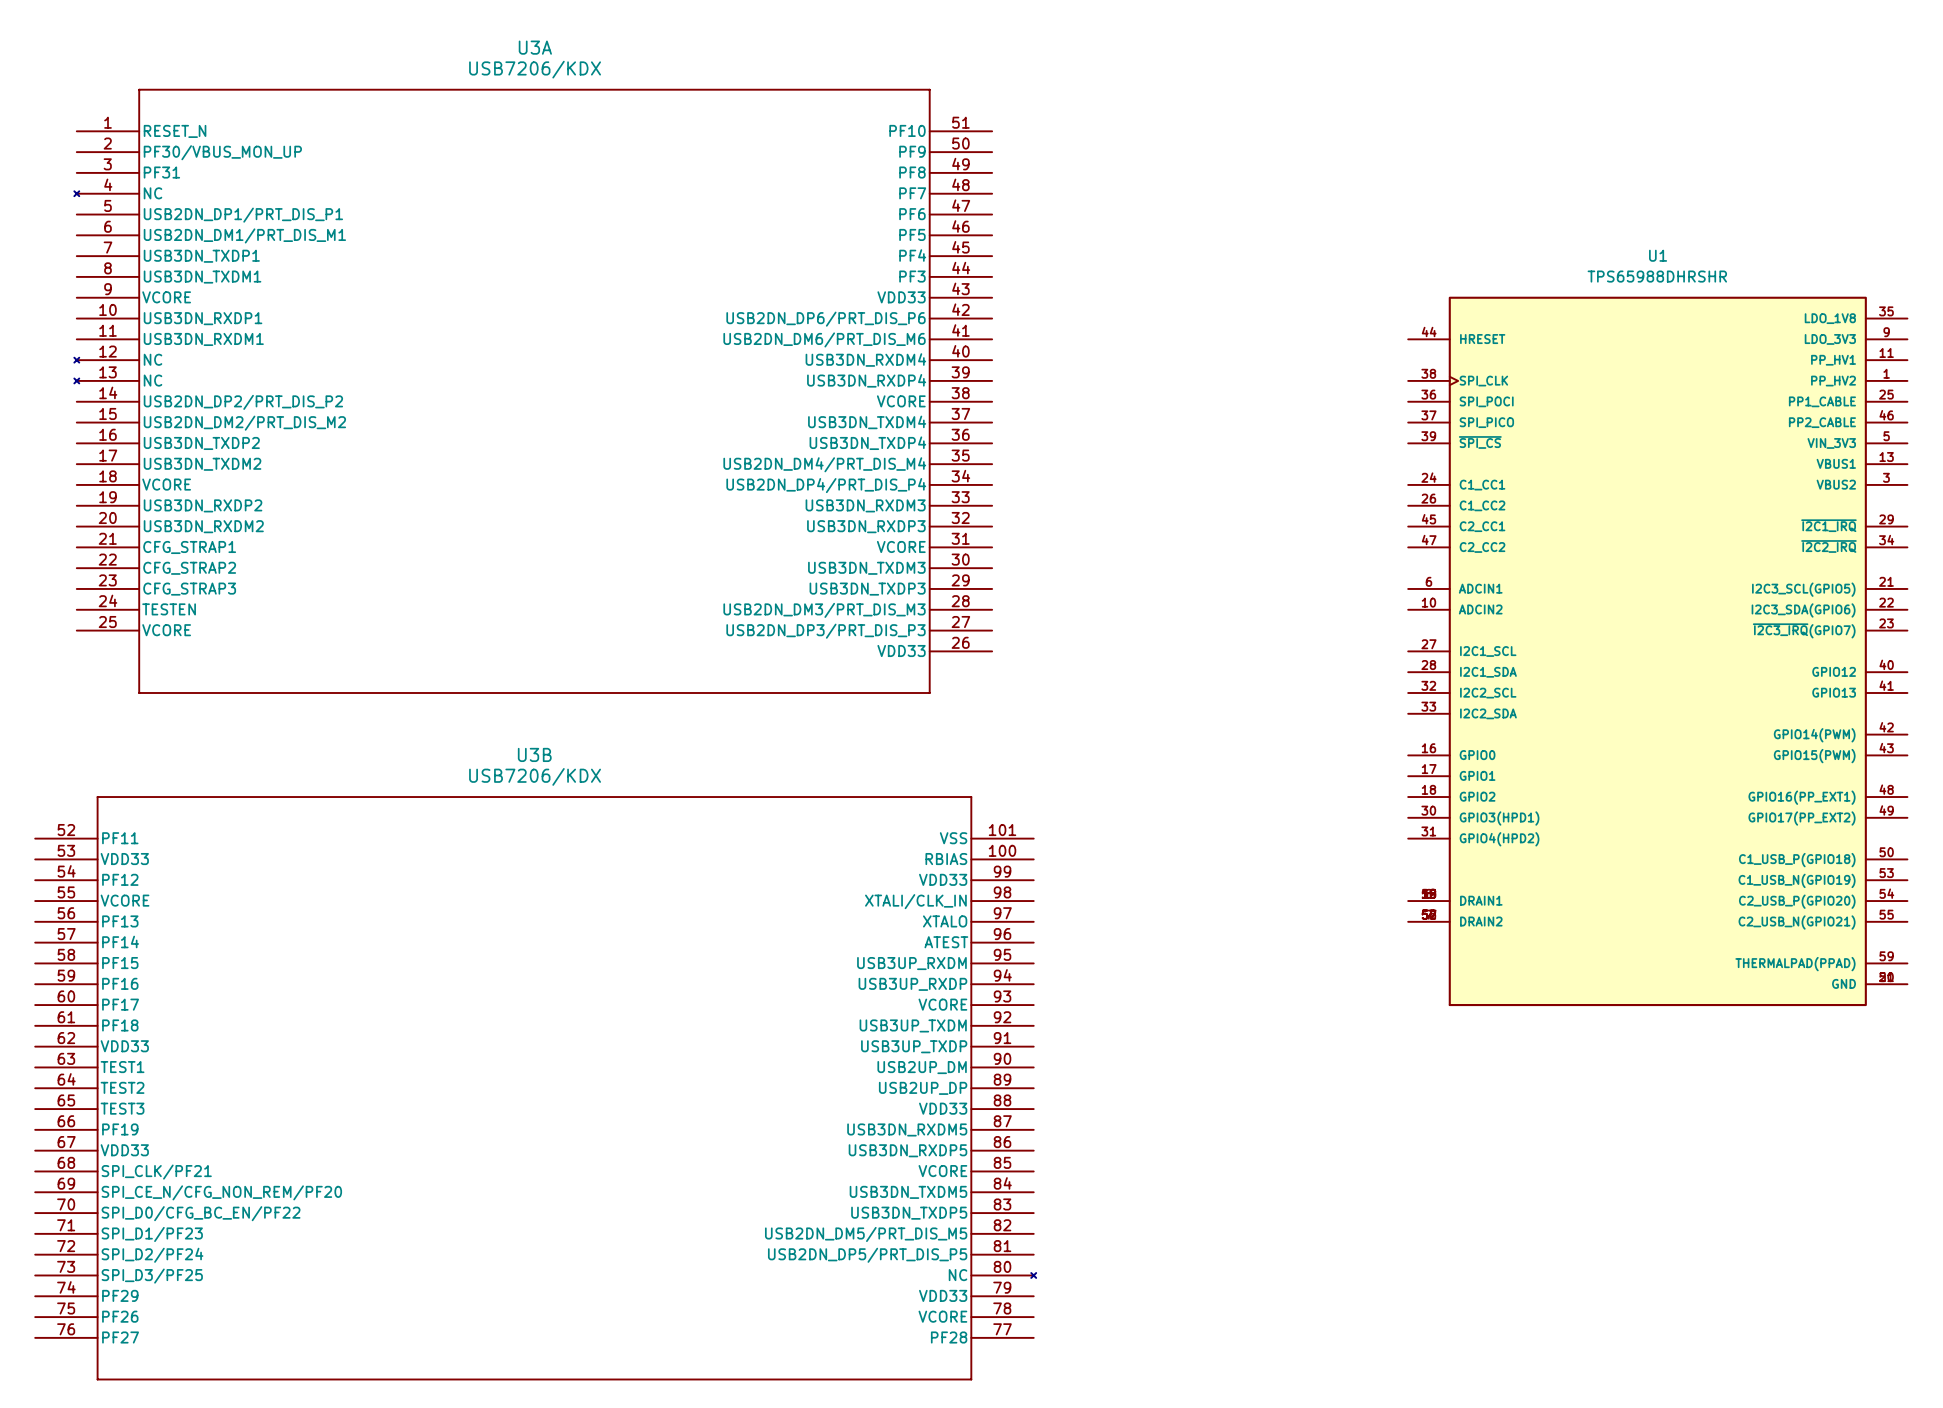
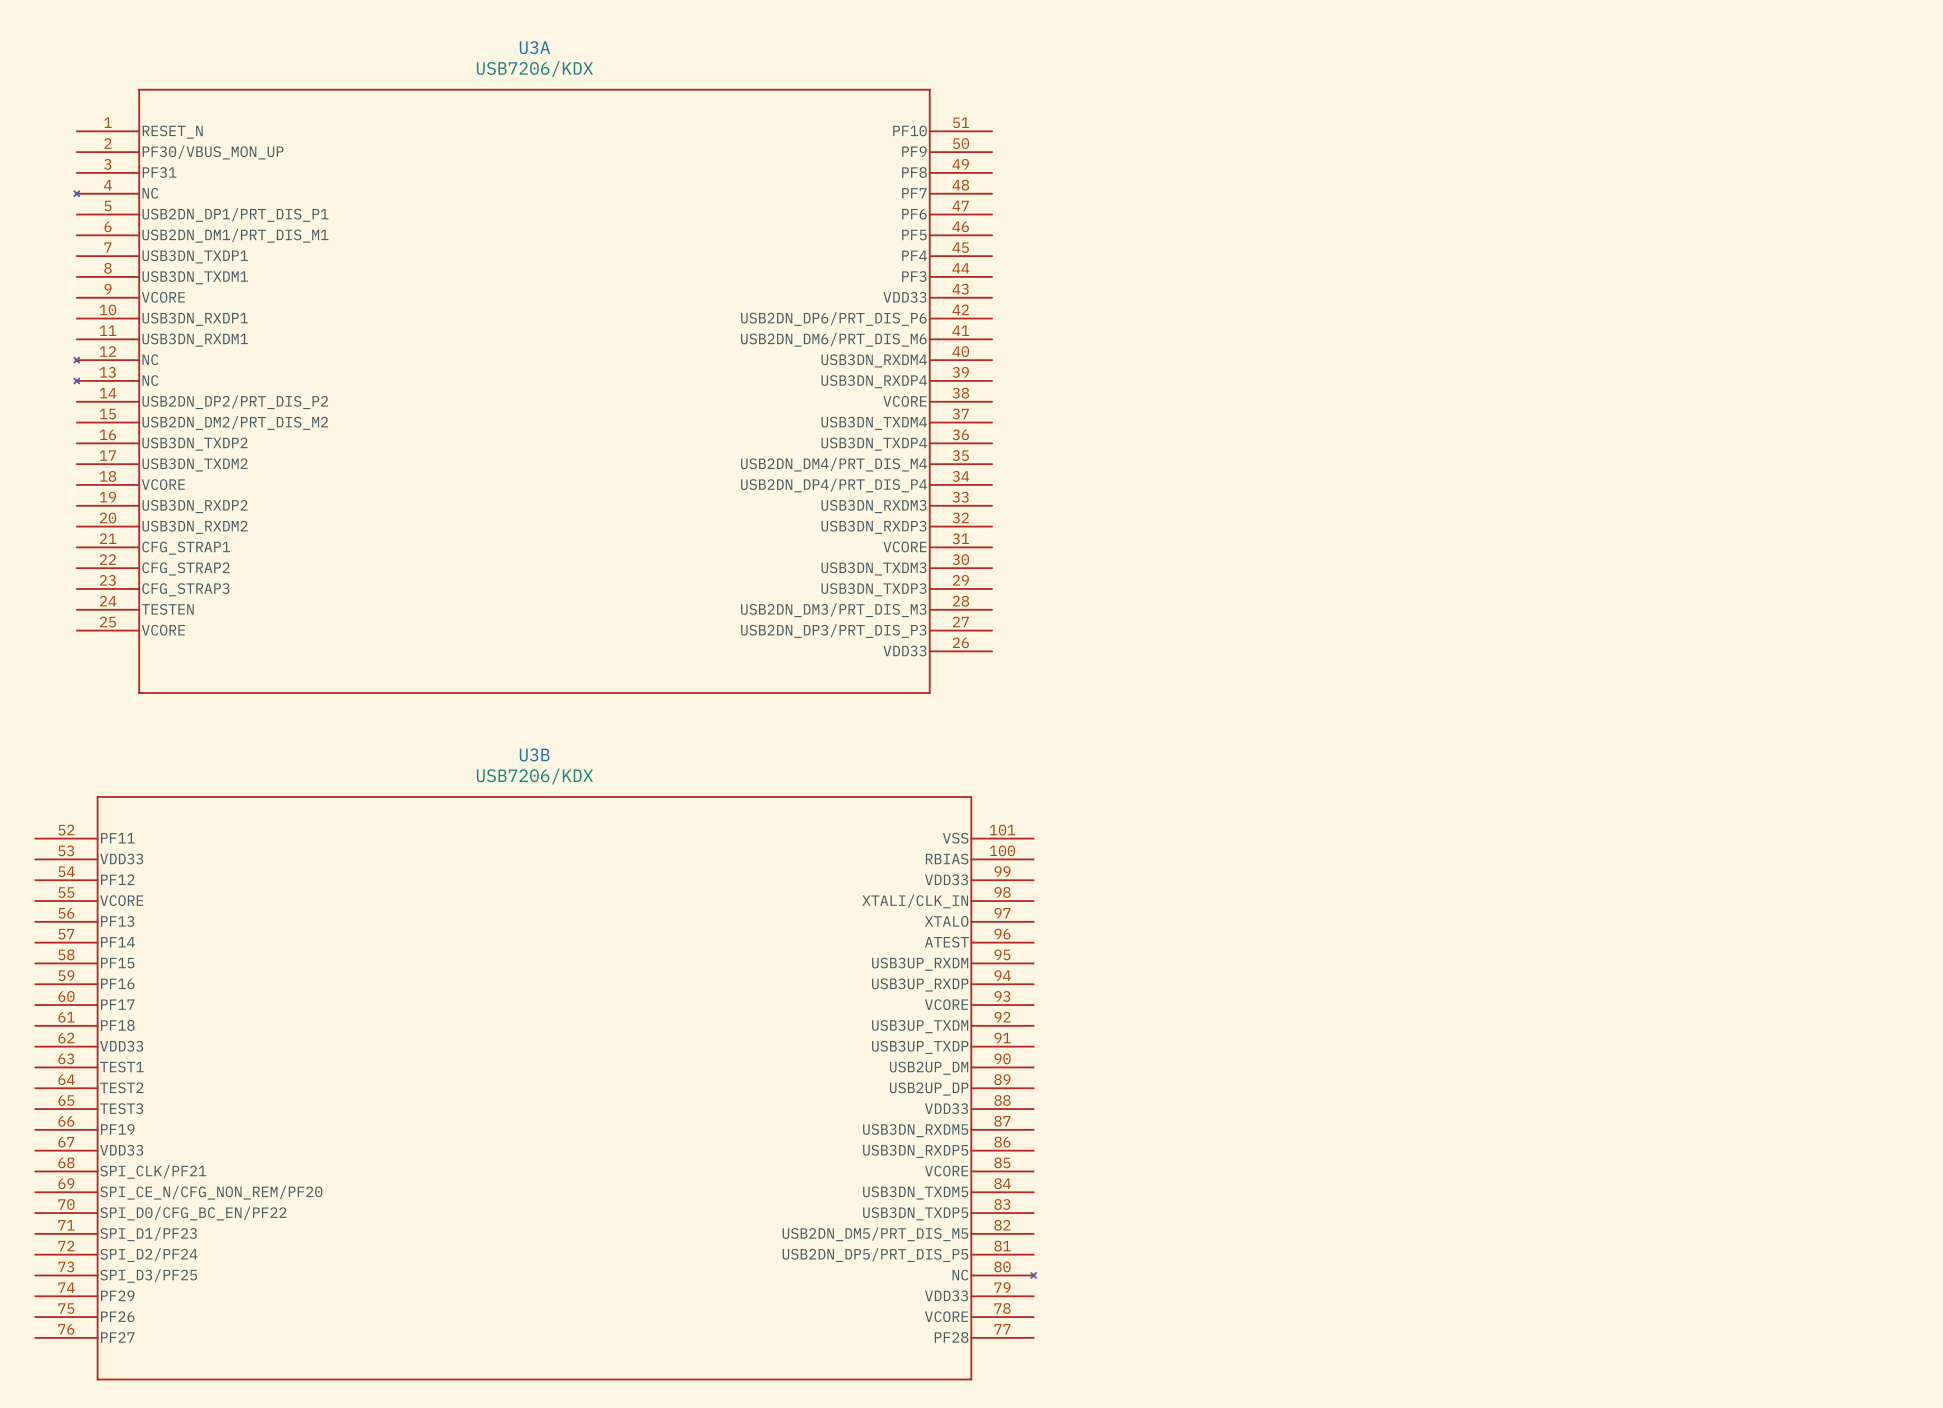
U1: TPS65988DHRSHR (1657, 651) -> none

